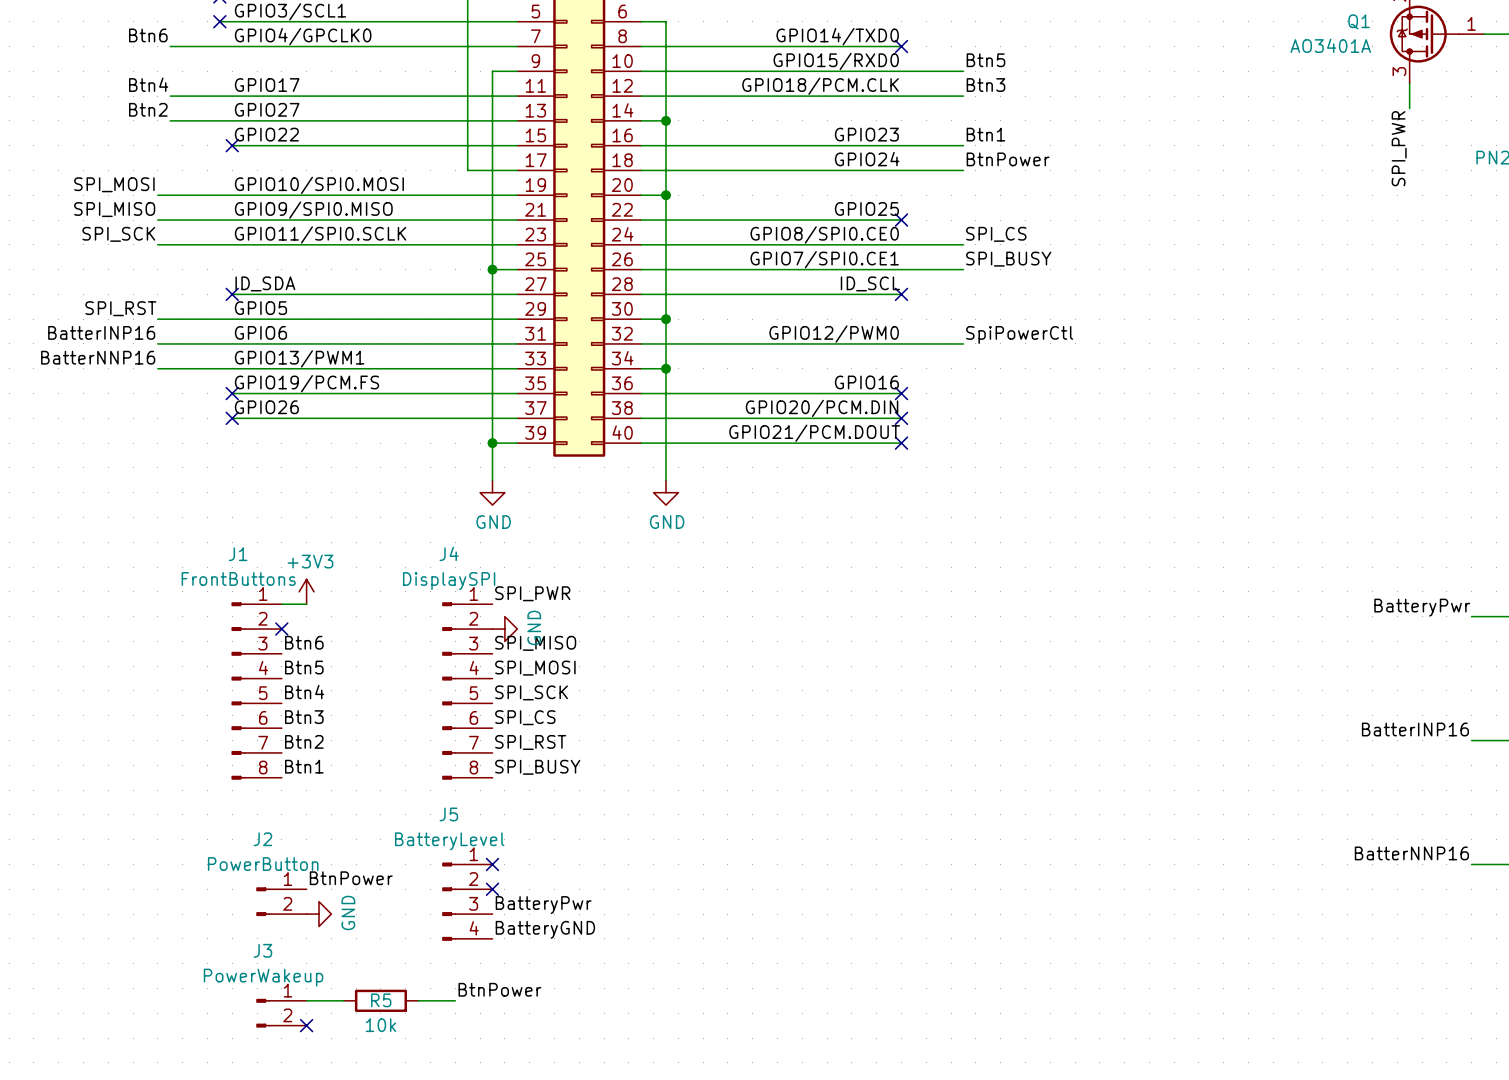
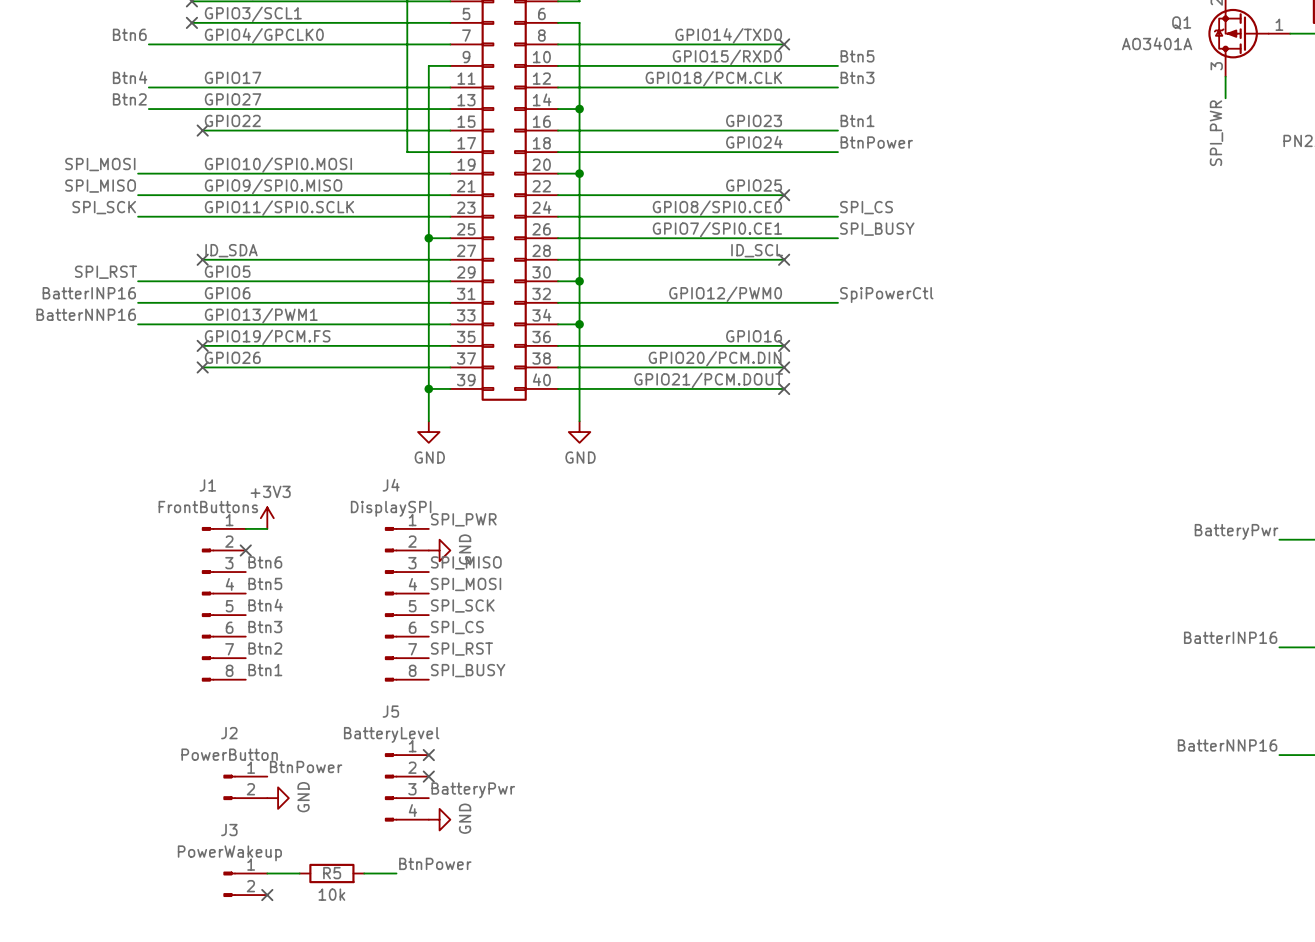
label: BatteryGND (545, 929) -> none
power symbol: none -> GND (439, 819)

